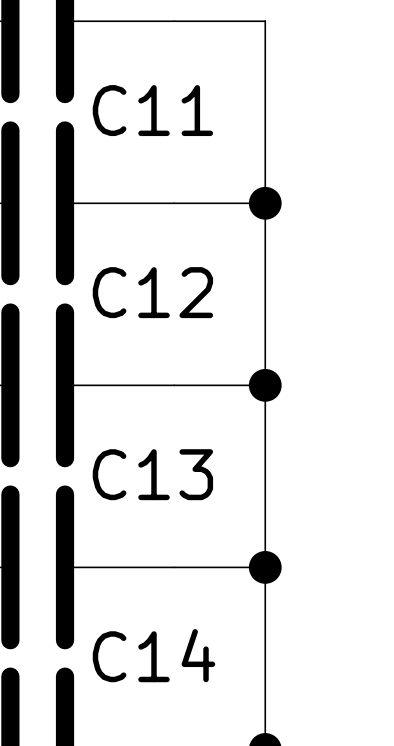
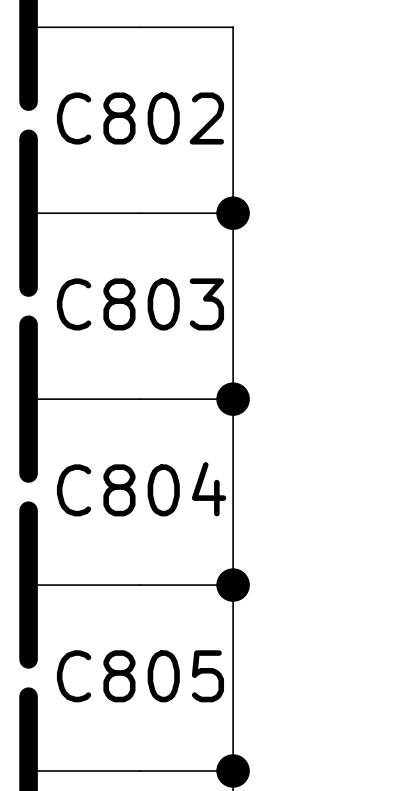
C11 name: C11 (152, 110) -> C802 (140, 118)
C12 name: C12 (152, 292) -> C803 (140, 304)
C13 name: C13 (152, 474) -> C804 (141, 489)
C14 name: C14 (154, 655) -> C805 (140, 676)

